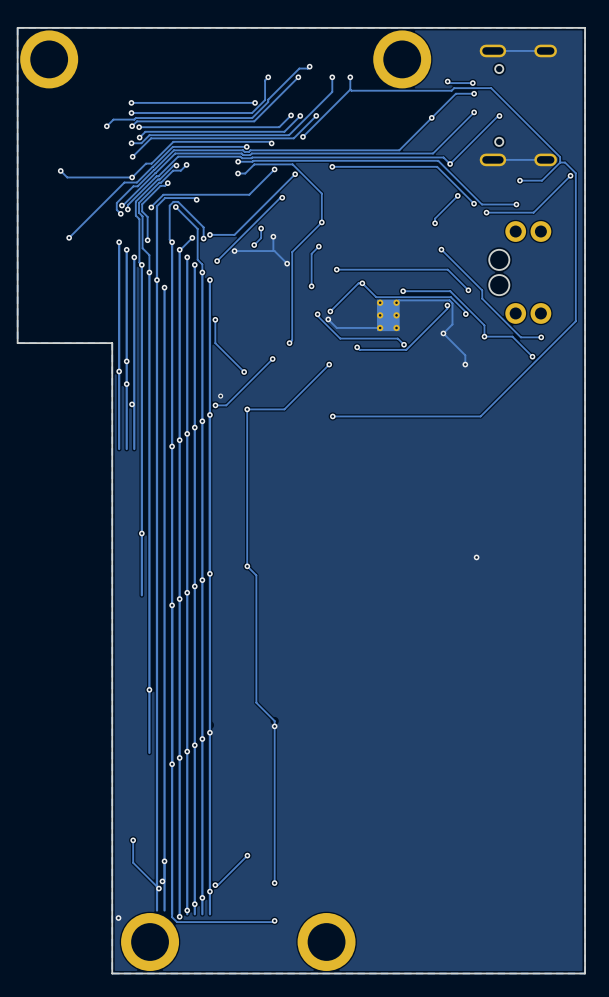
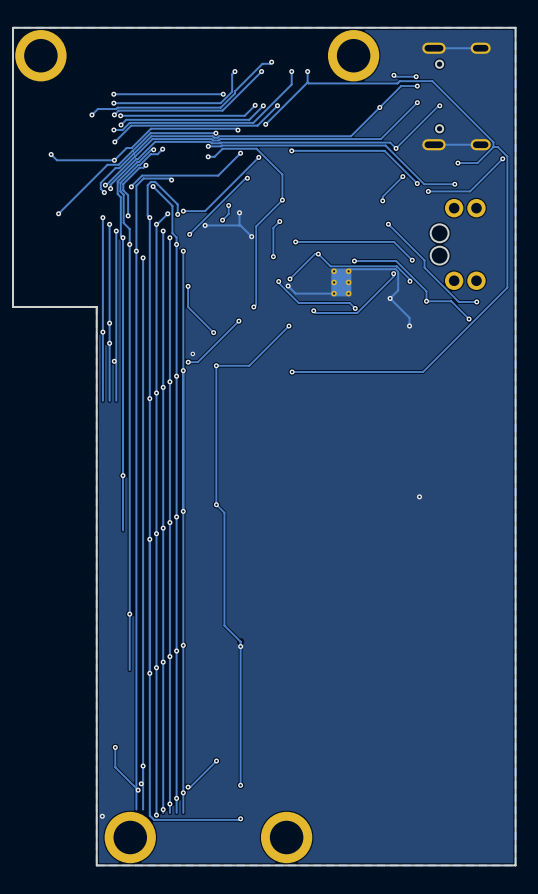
via: none -> (183, 645)
via: none -> (176, 650)
via: (209, 732) -> none
via: none -> (169, 656)
via: (202, 739) -> none
via: none -> (163, 662)
via: (194, 745) -> none
via: none -> (156, 667)
via: (187, 751) -> none
via: none -> (149, 673)
via: (179, 757) -> none
via: (172, 764) -> none

